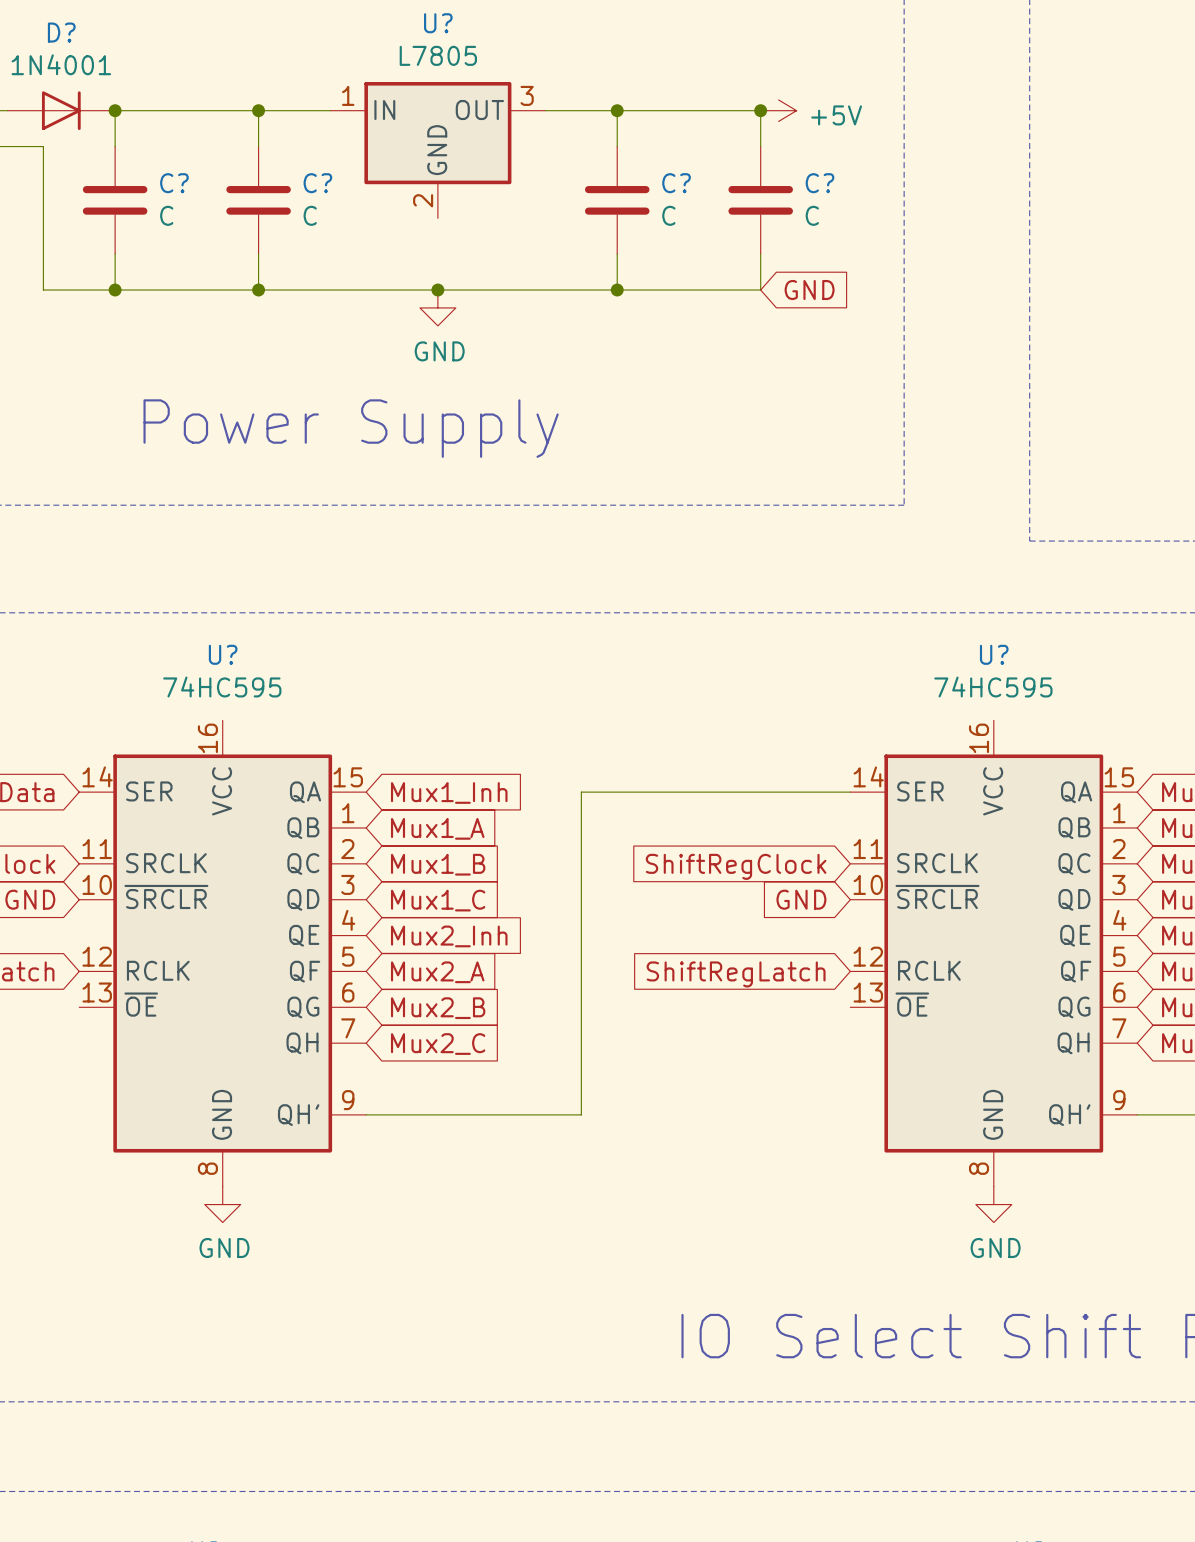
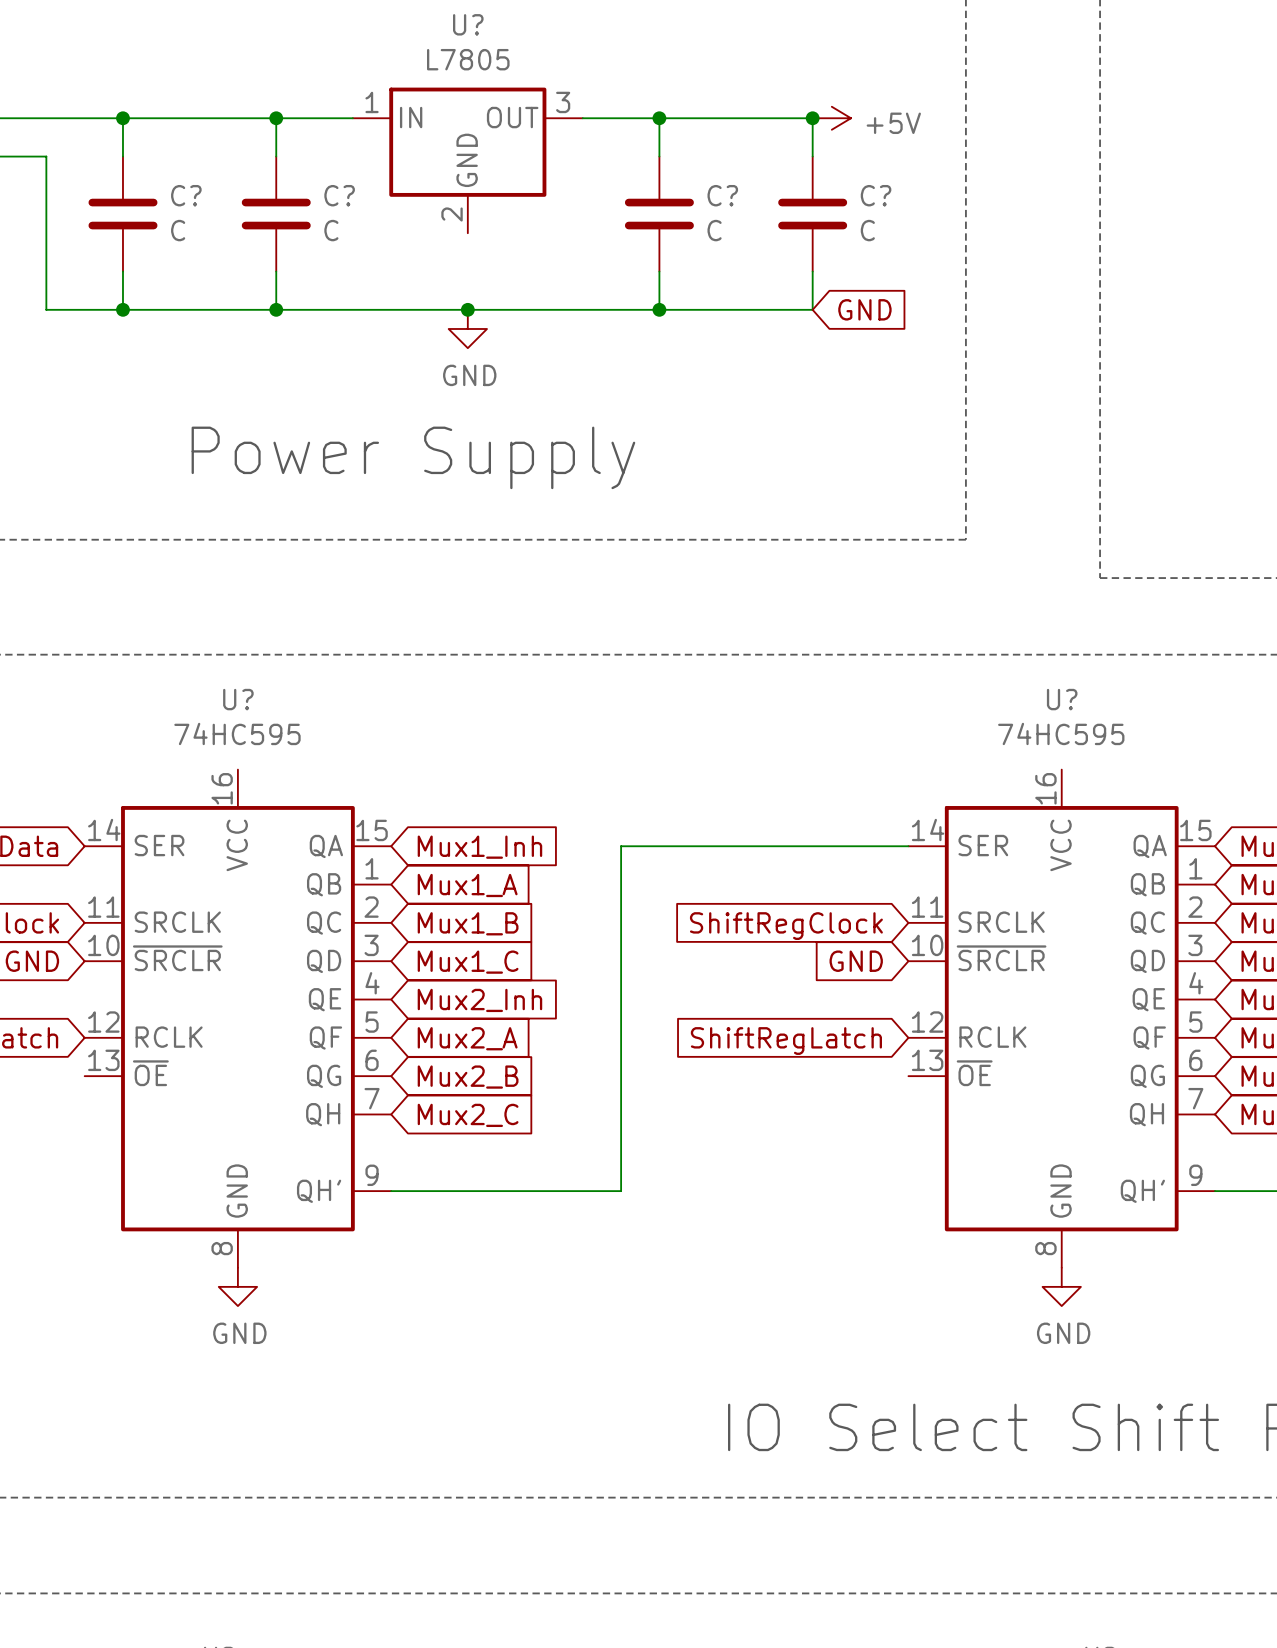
D?: 1N4001 (61, 110) -> none
text position: Power Supply (351, 428) -> Power Supply (413, 457)

